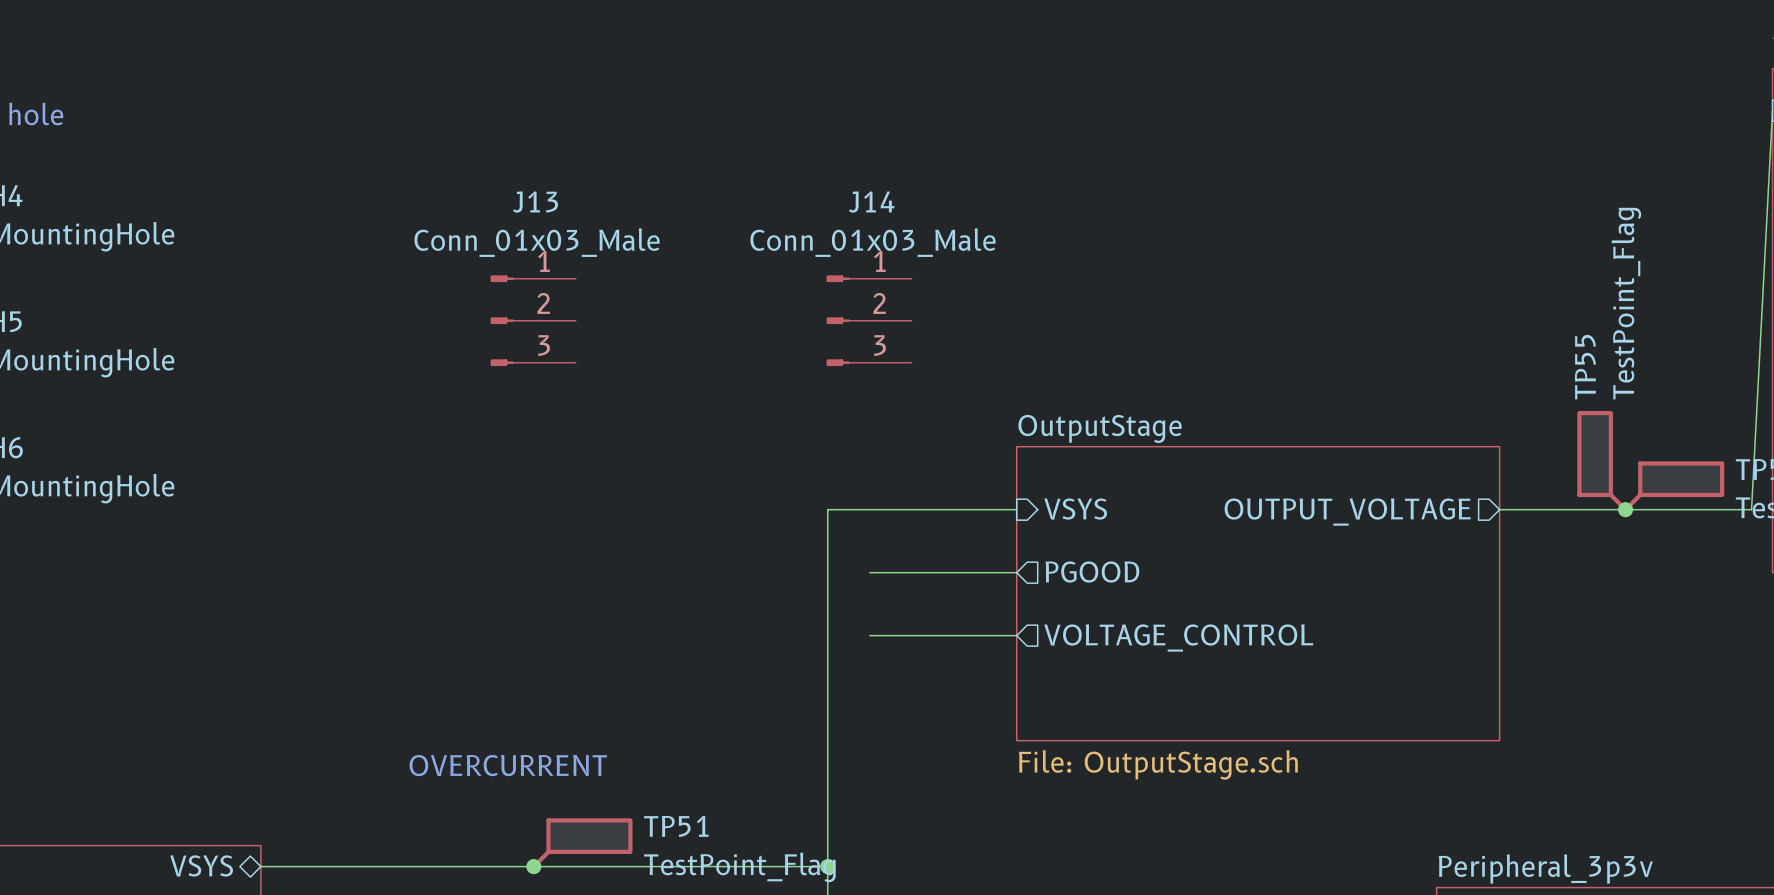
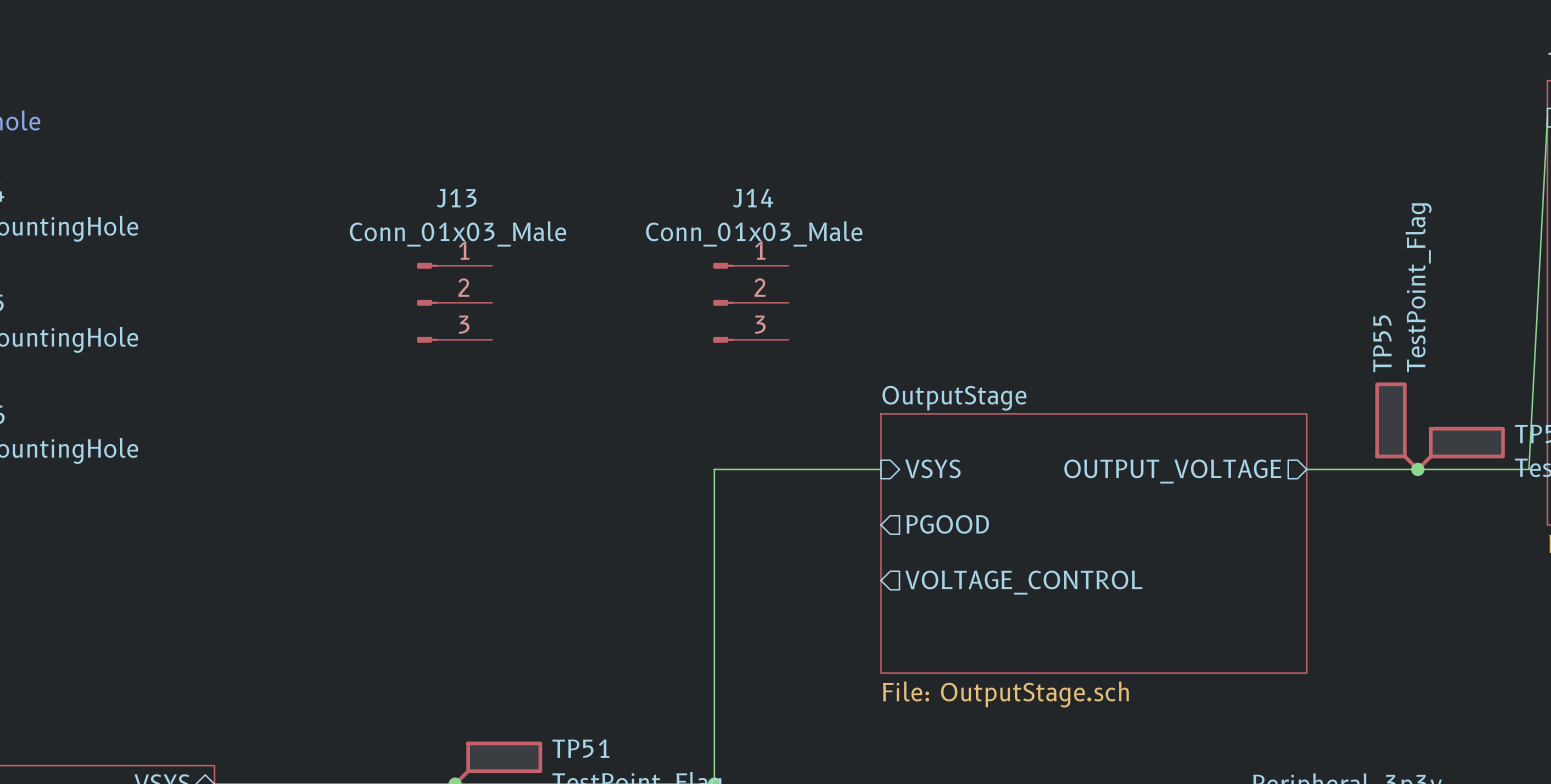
wire: (869, 572) (1016, 572) -> none
wire: (869, 635) (1016, 635) -> none
text: OVERCURRENT (508, 765) -> none

